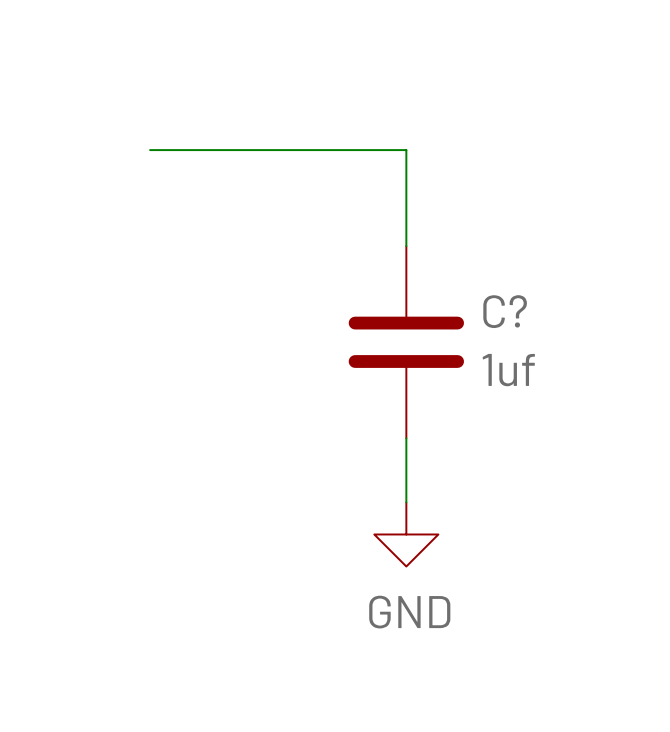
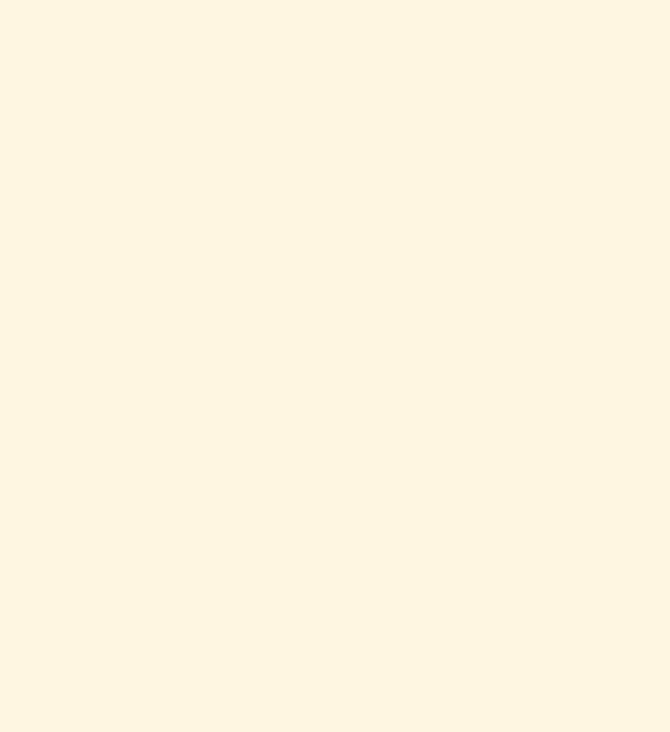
wire: (150, 150) (406, 150) (406, 246) -> none
C?: 1uf (406, 342) -> none
wire: (406, 438) (406, 502) -> none
power symbol: GND (406, 534) -> none

